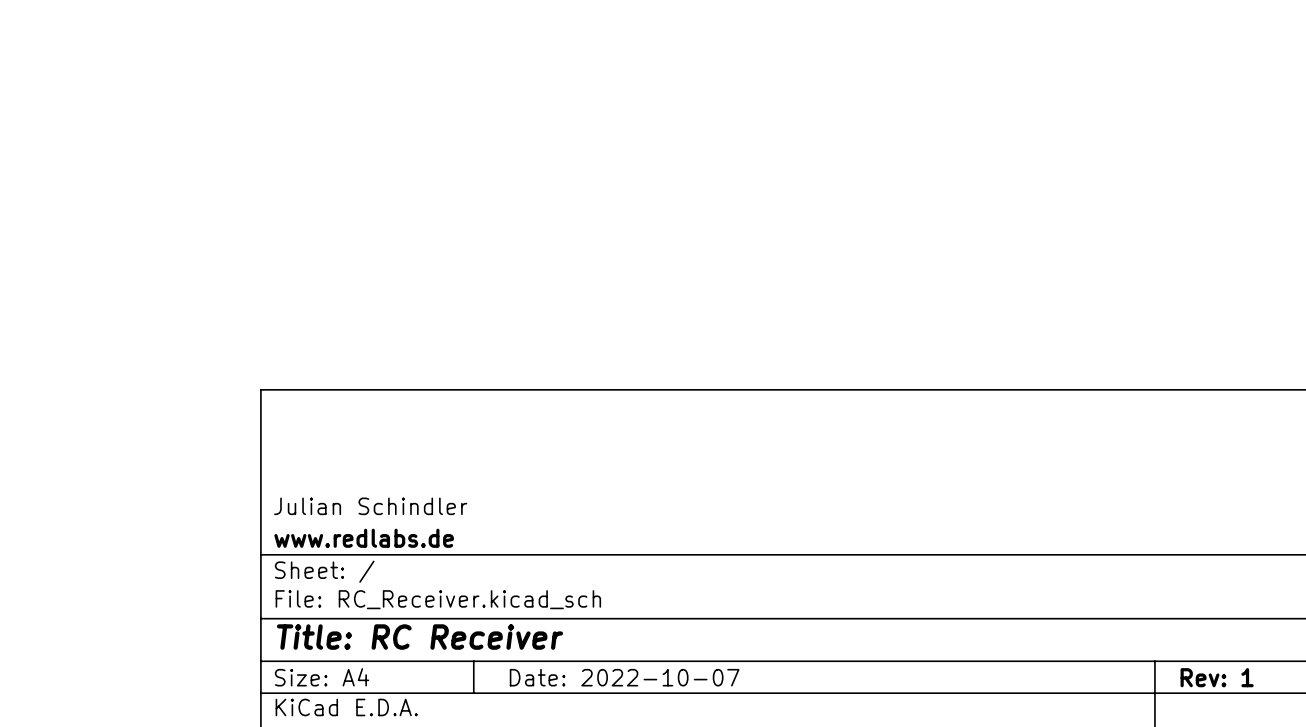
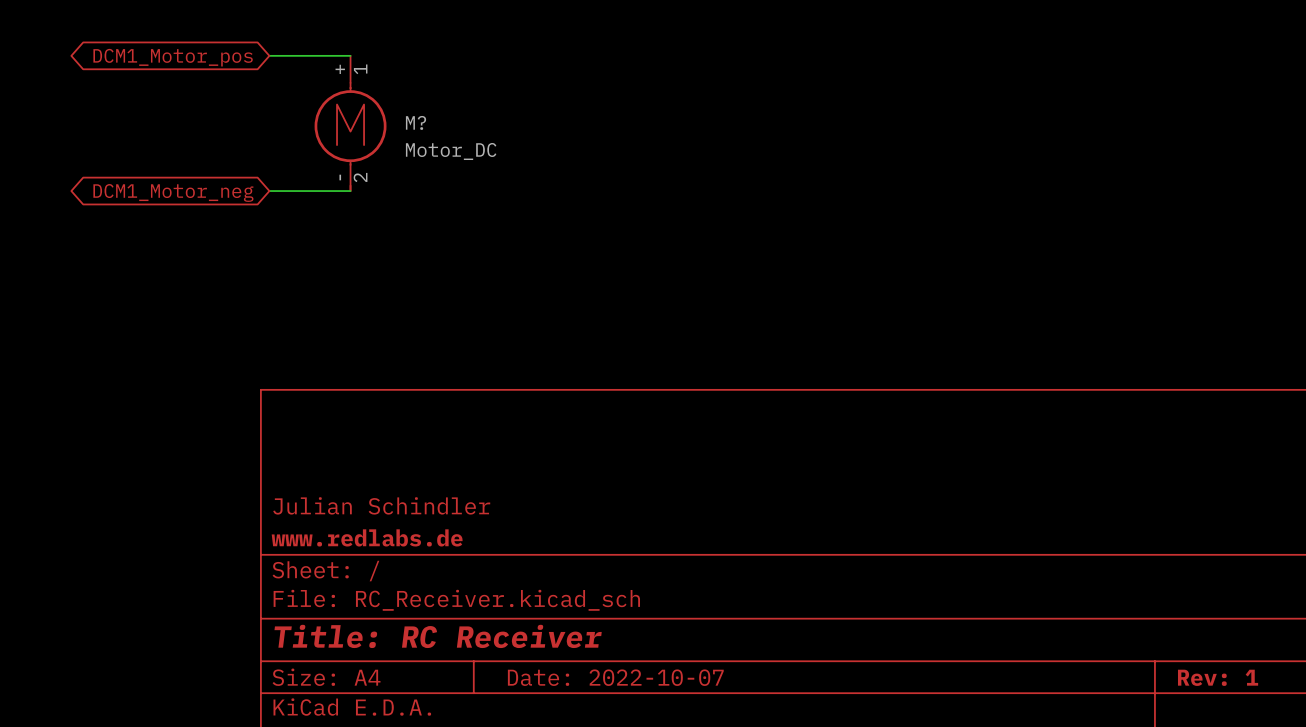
wire: none -> (269, 55) (350, 55)
global label: none -> DCM1_Motor_pos (173, 57)
M?: none -> Motor_DC (350, 123)
wire: none -> (269, 191) (350, 191)
global label: none -> DCM1_Motor_neg (173, 192)

